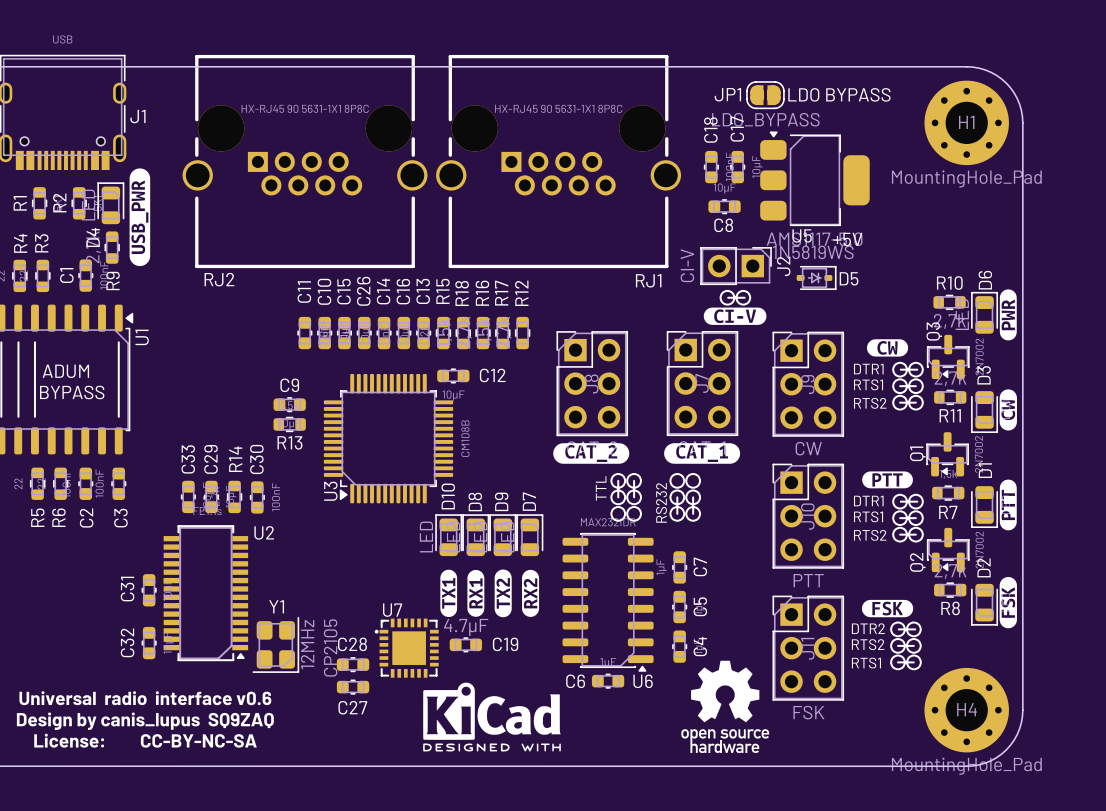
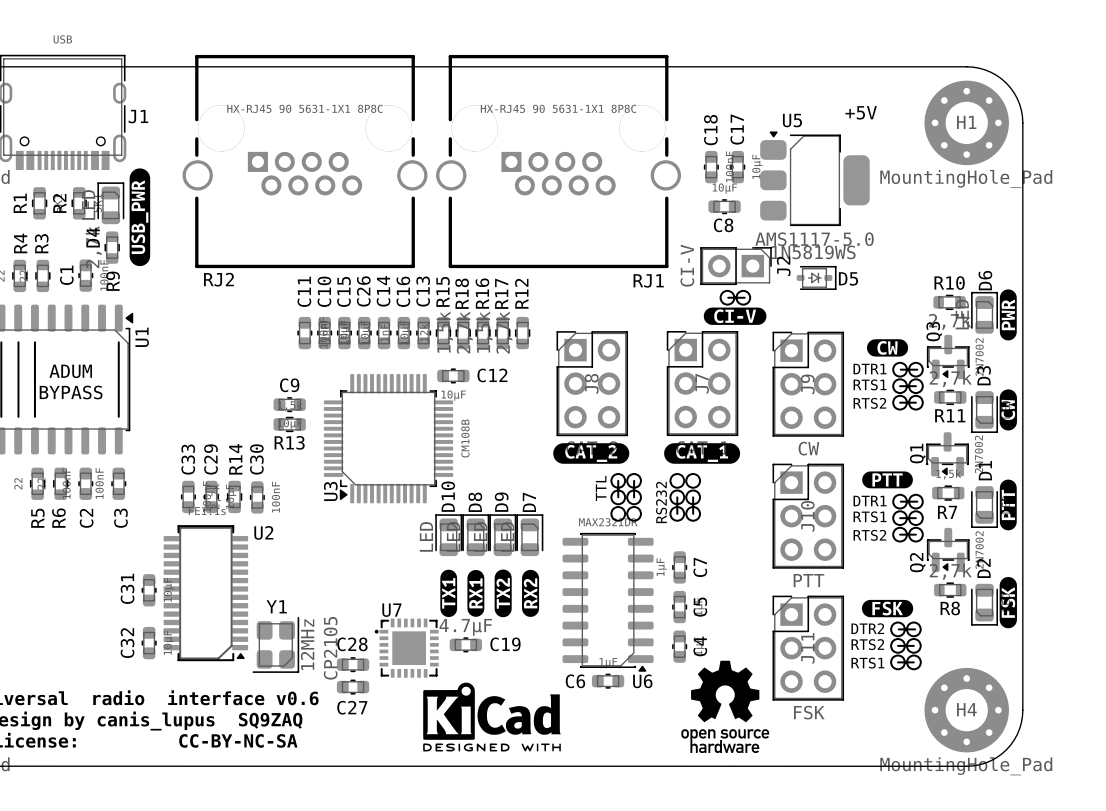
text: LDO BYPASS (839, 94) -> none
JP1: LDO_BYPASS (765, 95) -> none
U5 name position: U5 (802, 235) -> U5 (792, 120)
text position: +5V (847, 239) -> +5V (861, 112)

